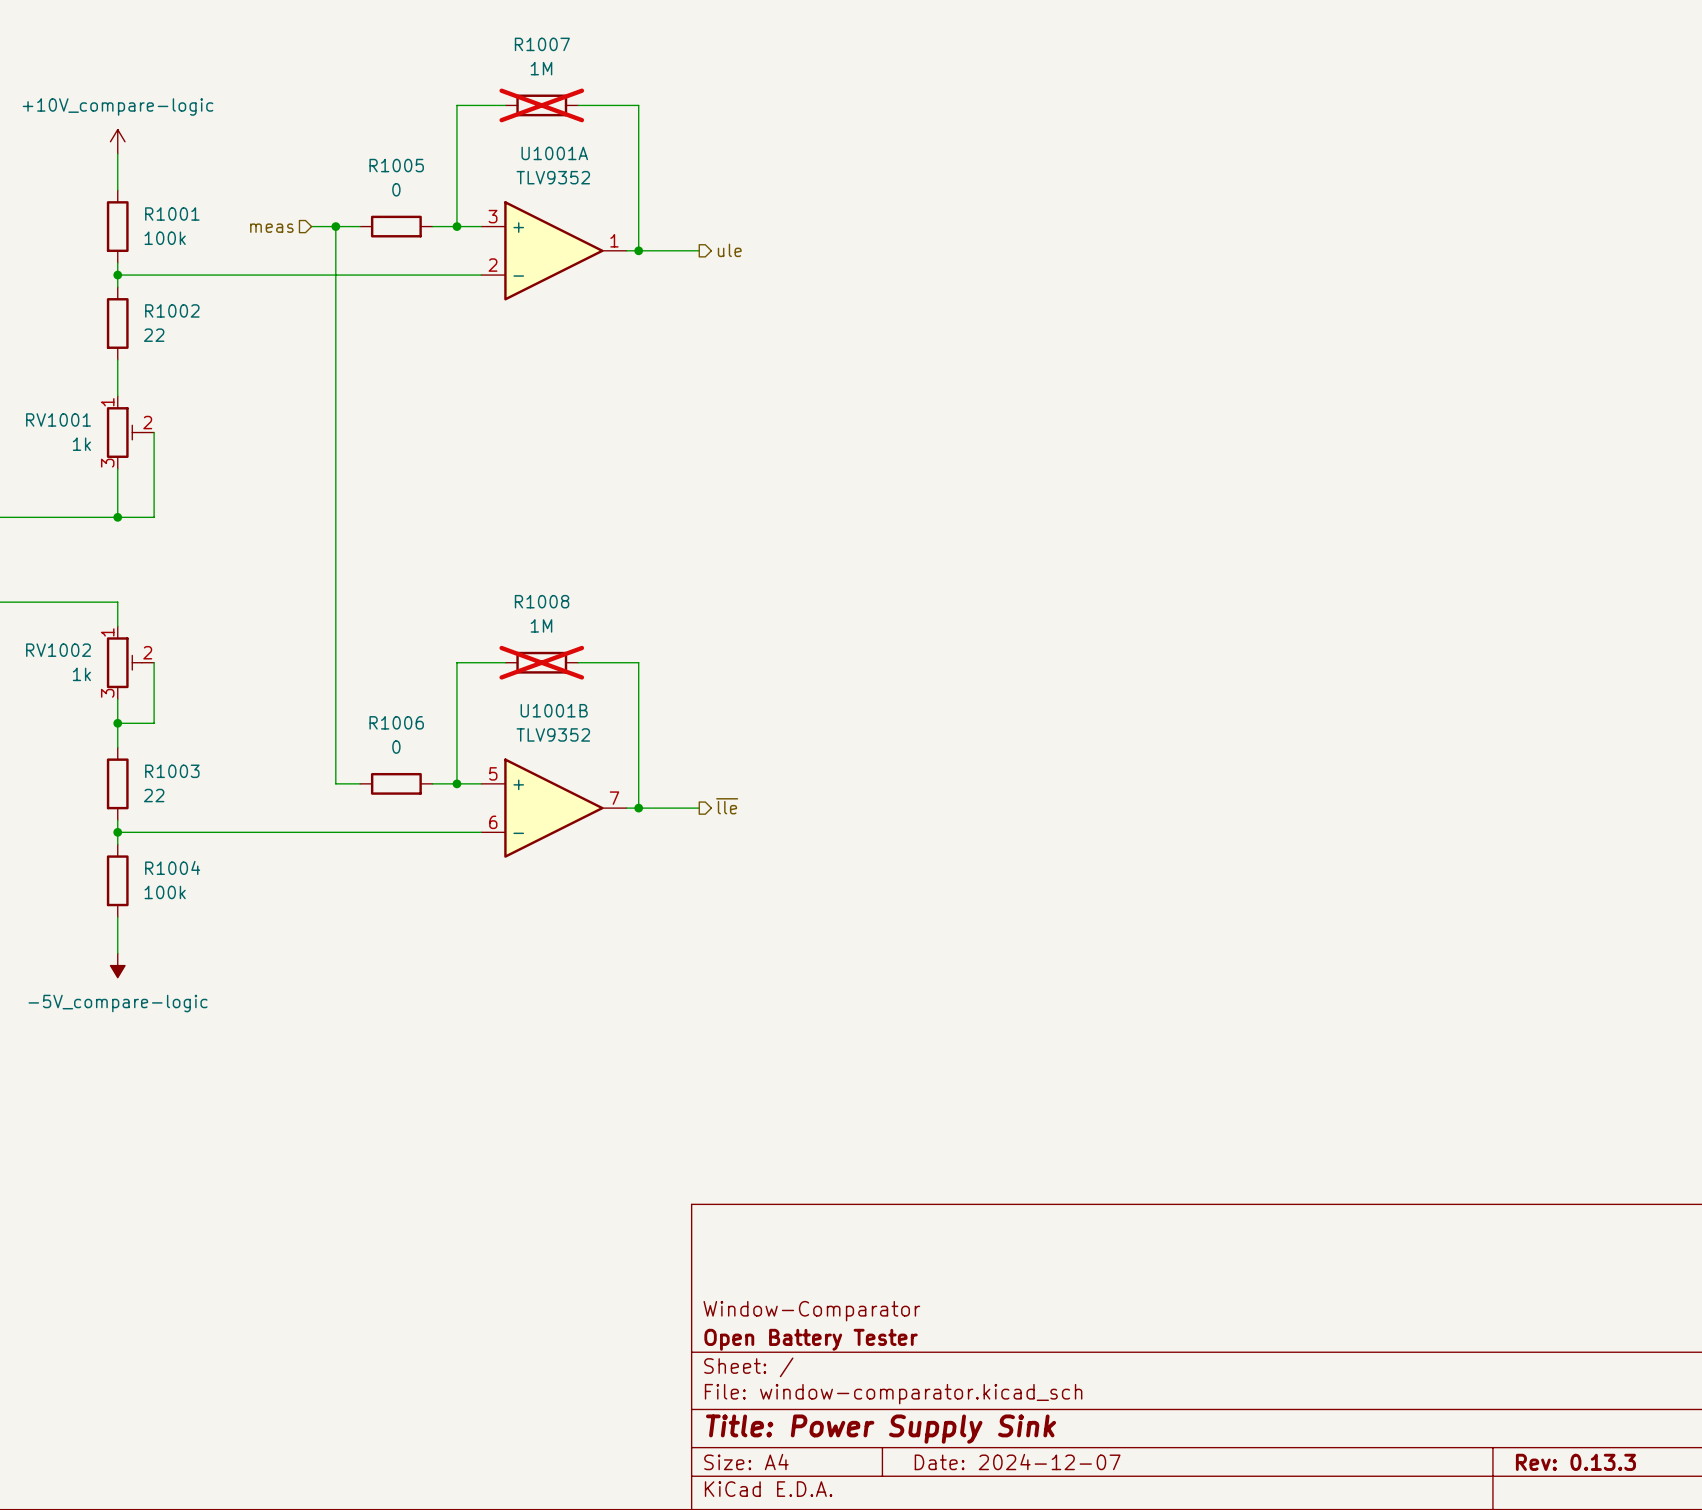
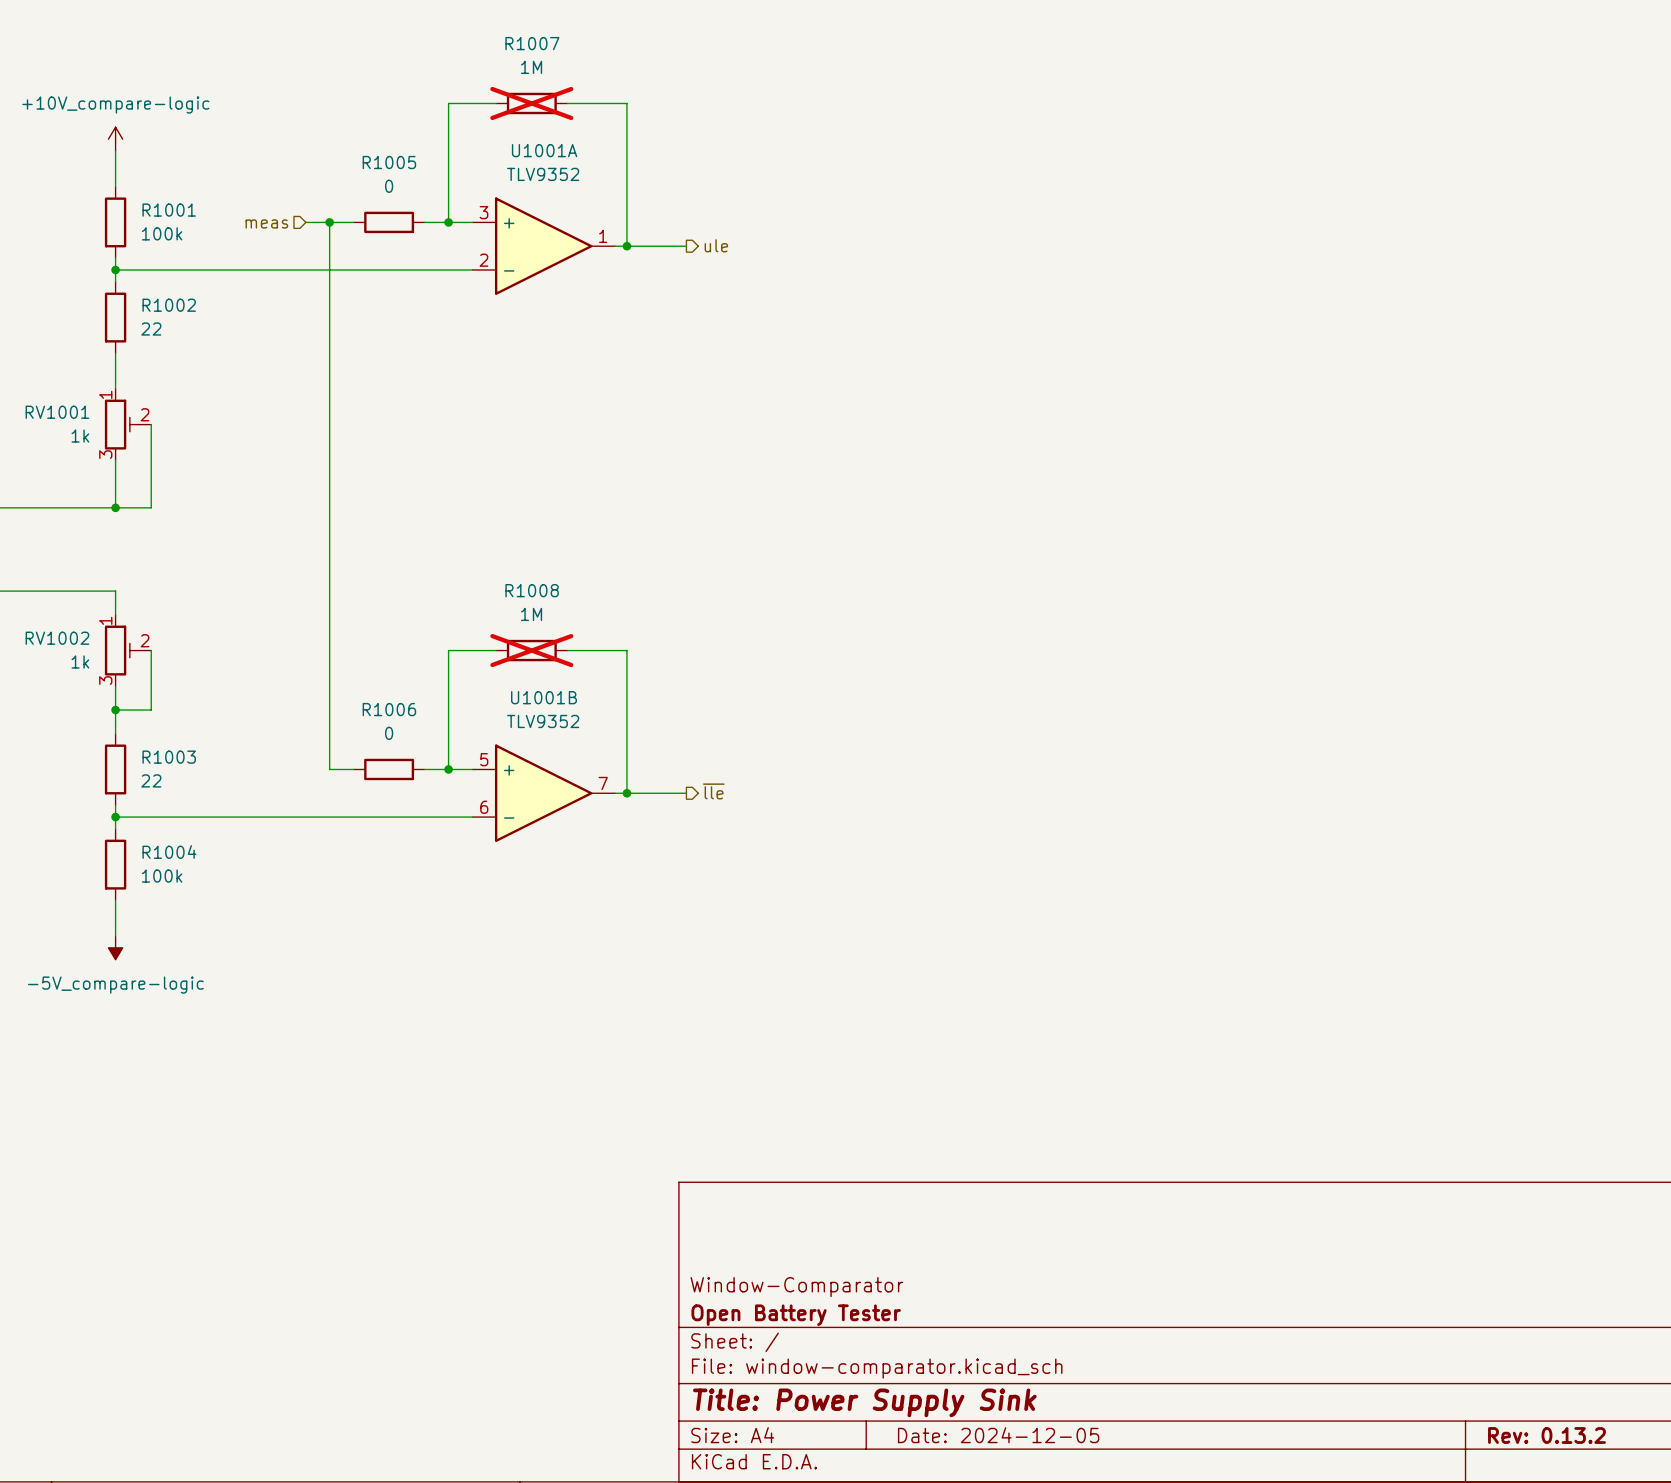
title block: Date: 2024-12-07 (1017, 1462) -> Date: 2024-12-05 (998, 1435)
title block: Rev: 0.13.3 (1575, 1462) -> Rev: 0.13.2 (1546, 1435)

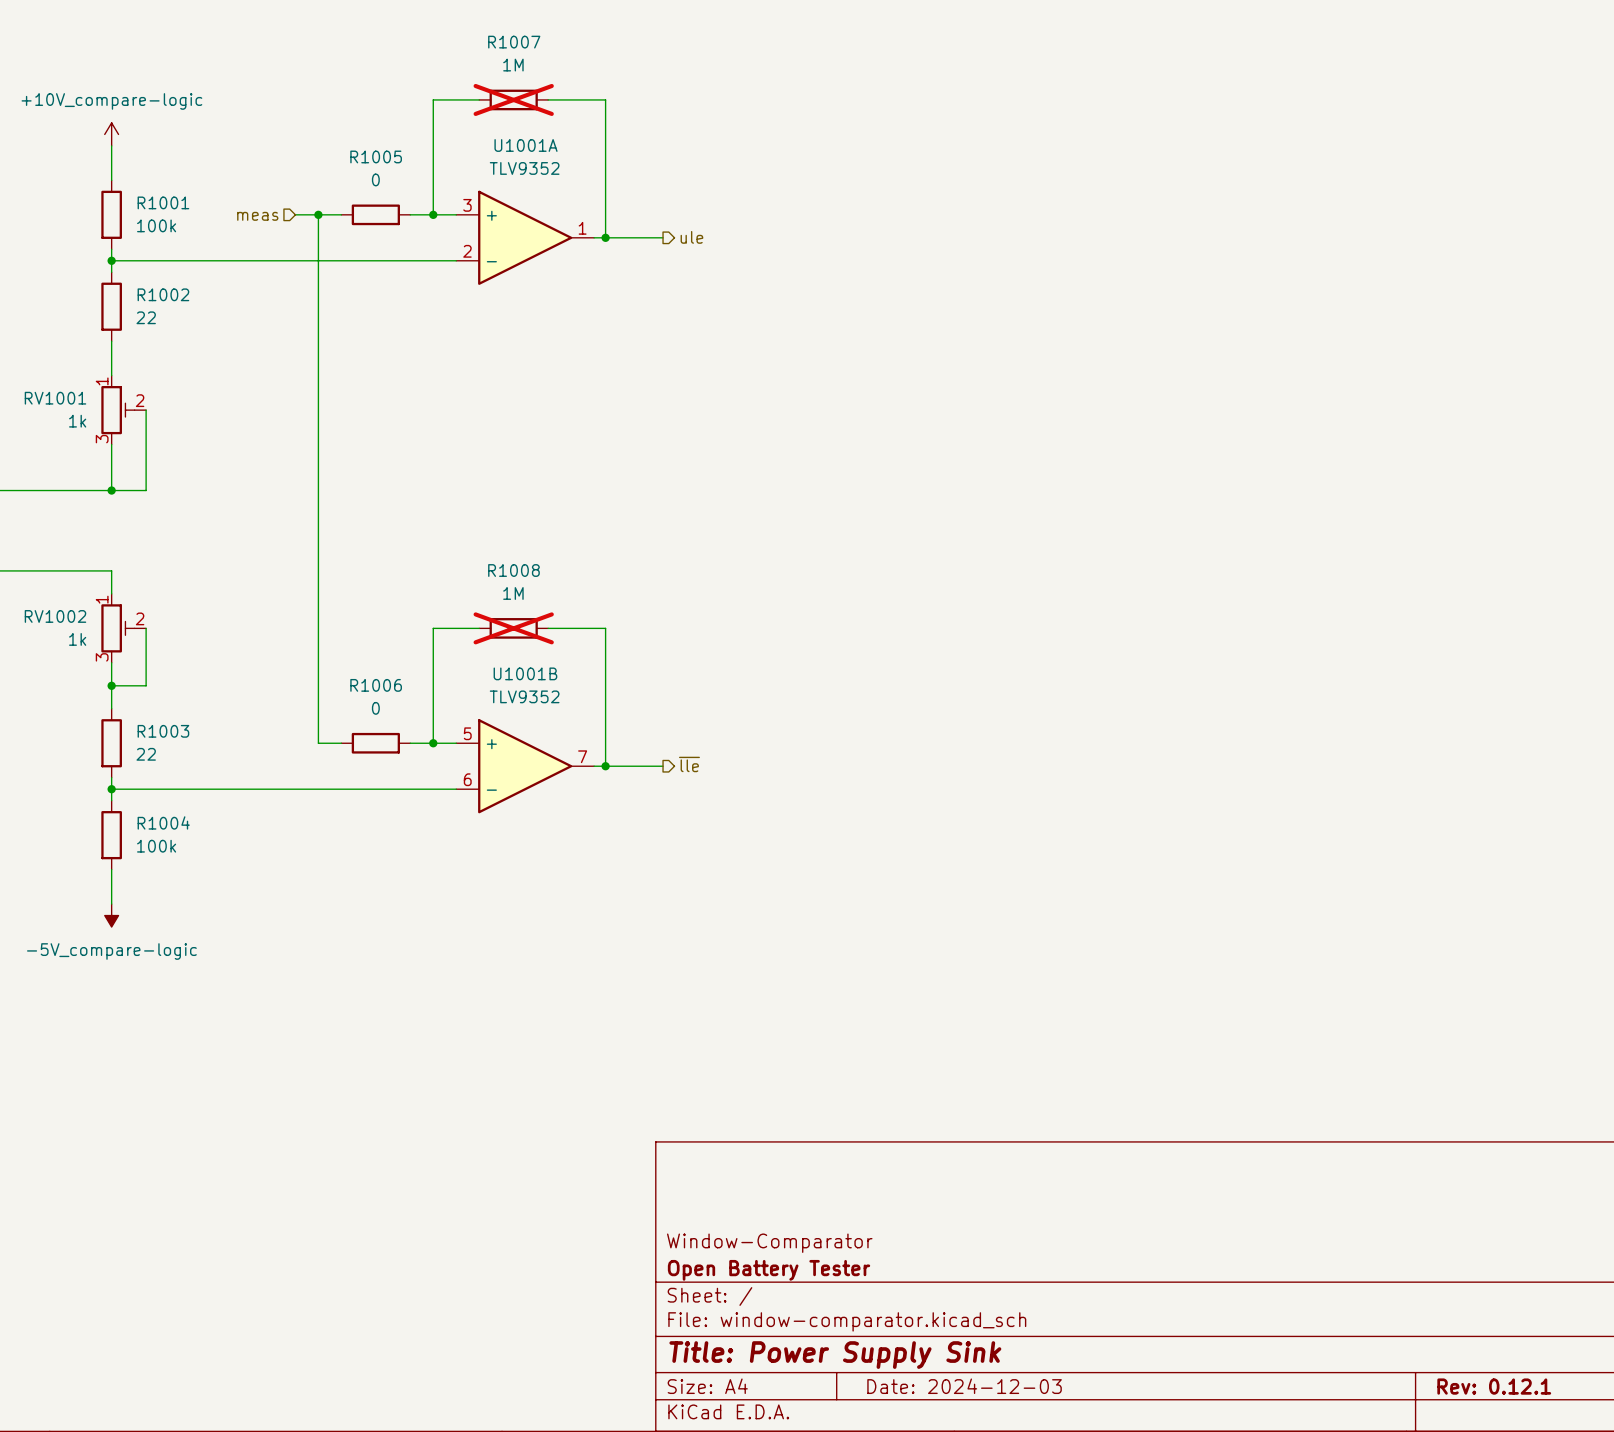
title block: Date: 2024-12-05 (998, 1435) -> Date: 2024-12-03 (964, 1386)
title block: Rev: 0.13.2 (1546, 1435) -> Rev: 0.12.1 (1494, 1386)

